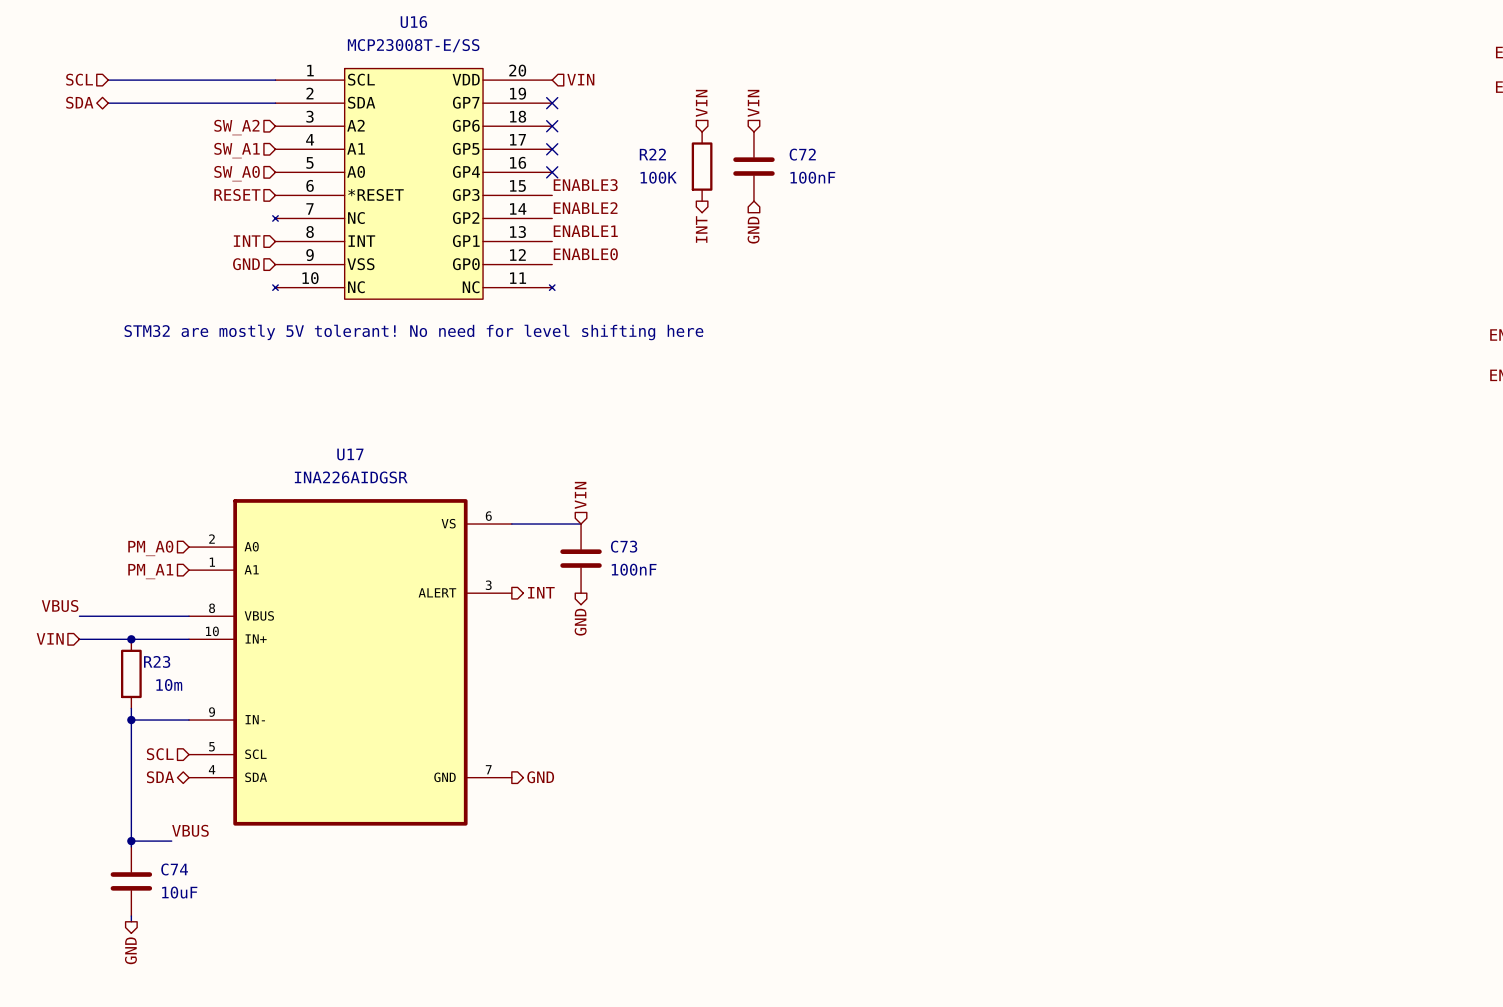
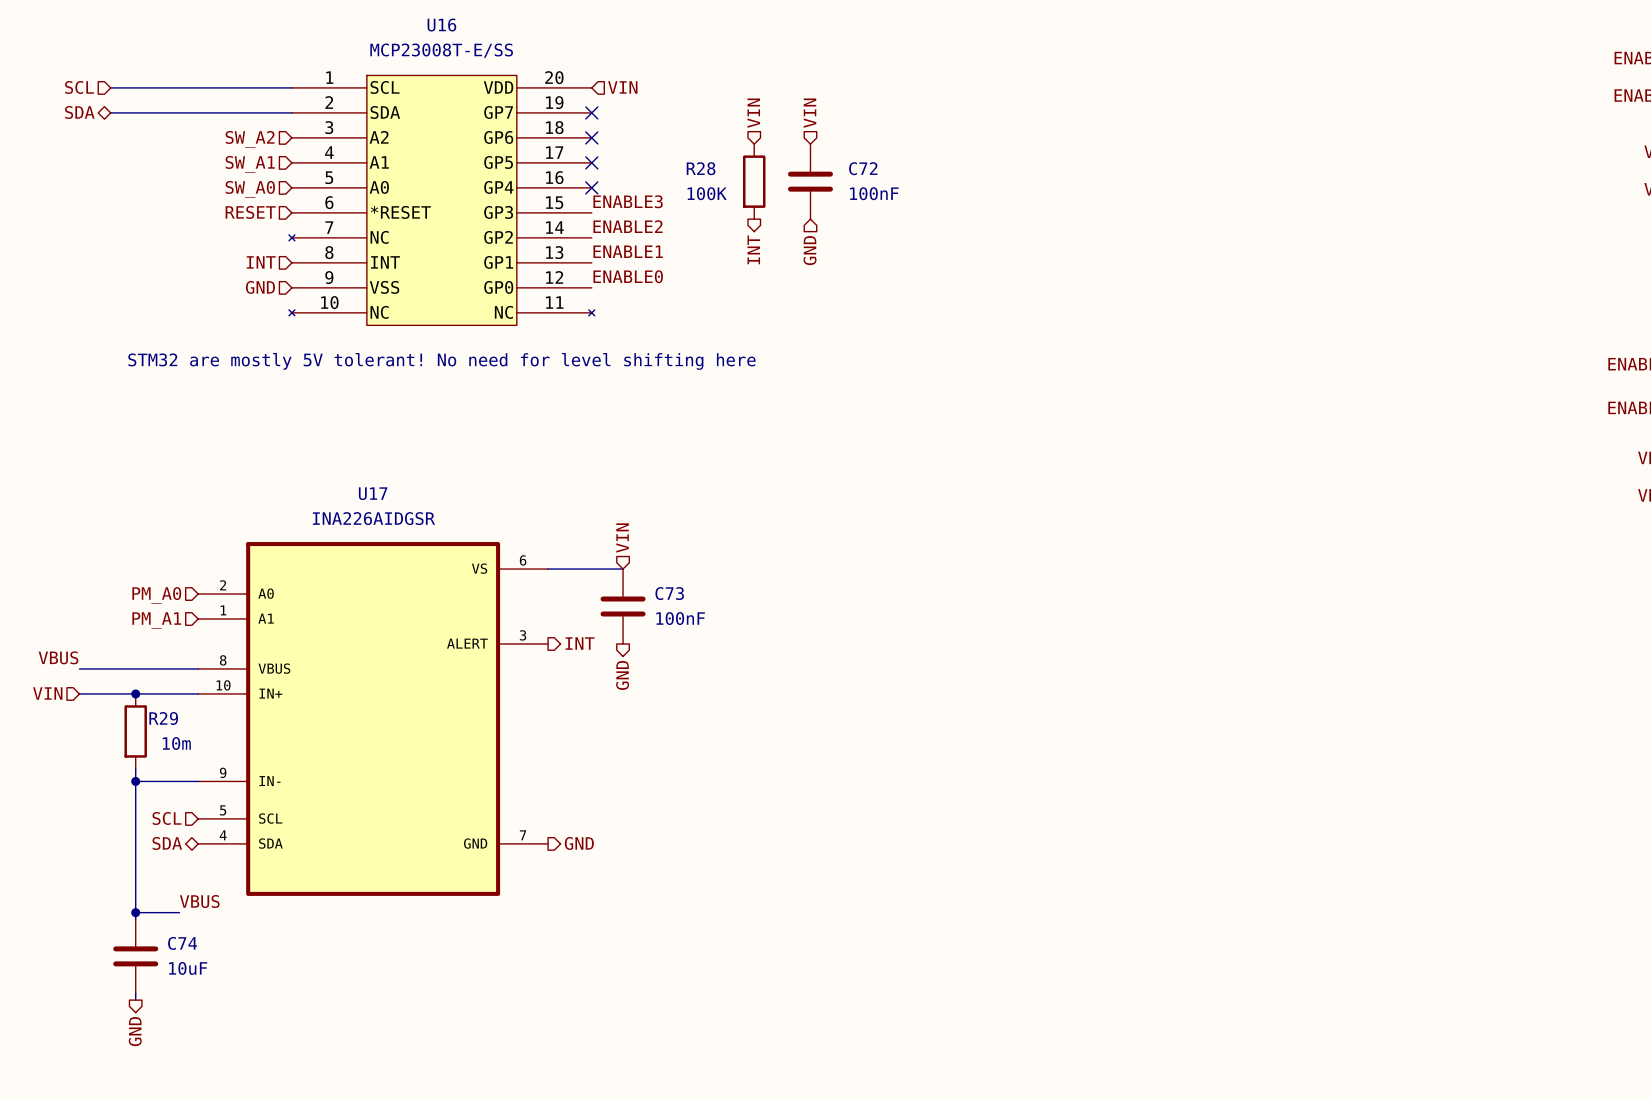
R22 name: R22 (652, 154) -> R28 (701, 168)
R23 name: R23 (157, 661) -> R29 (163, 718)

